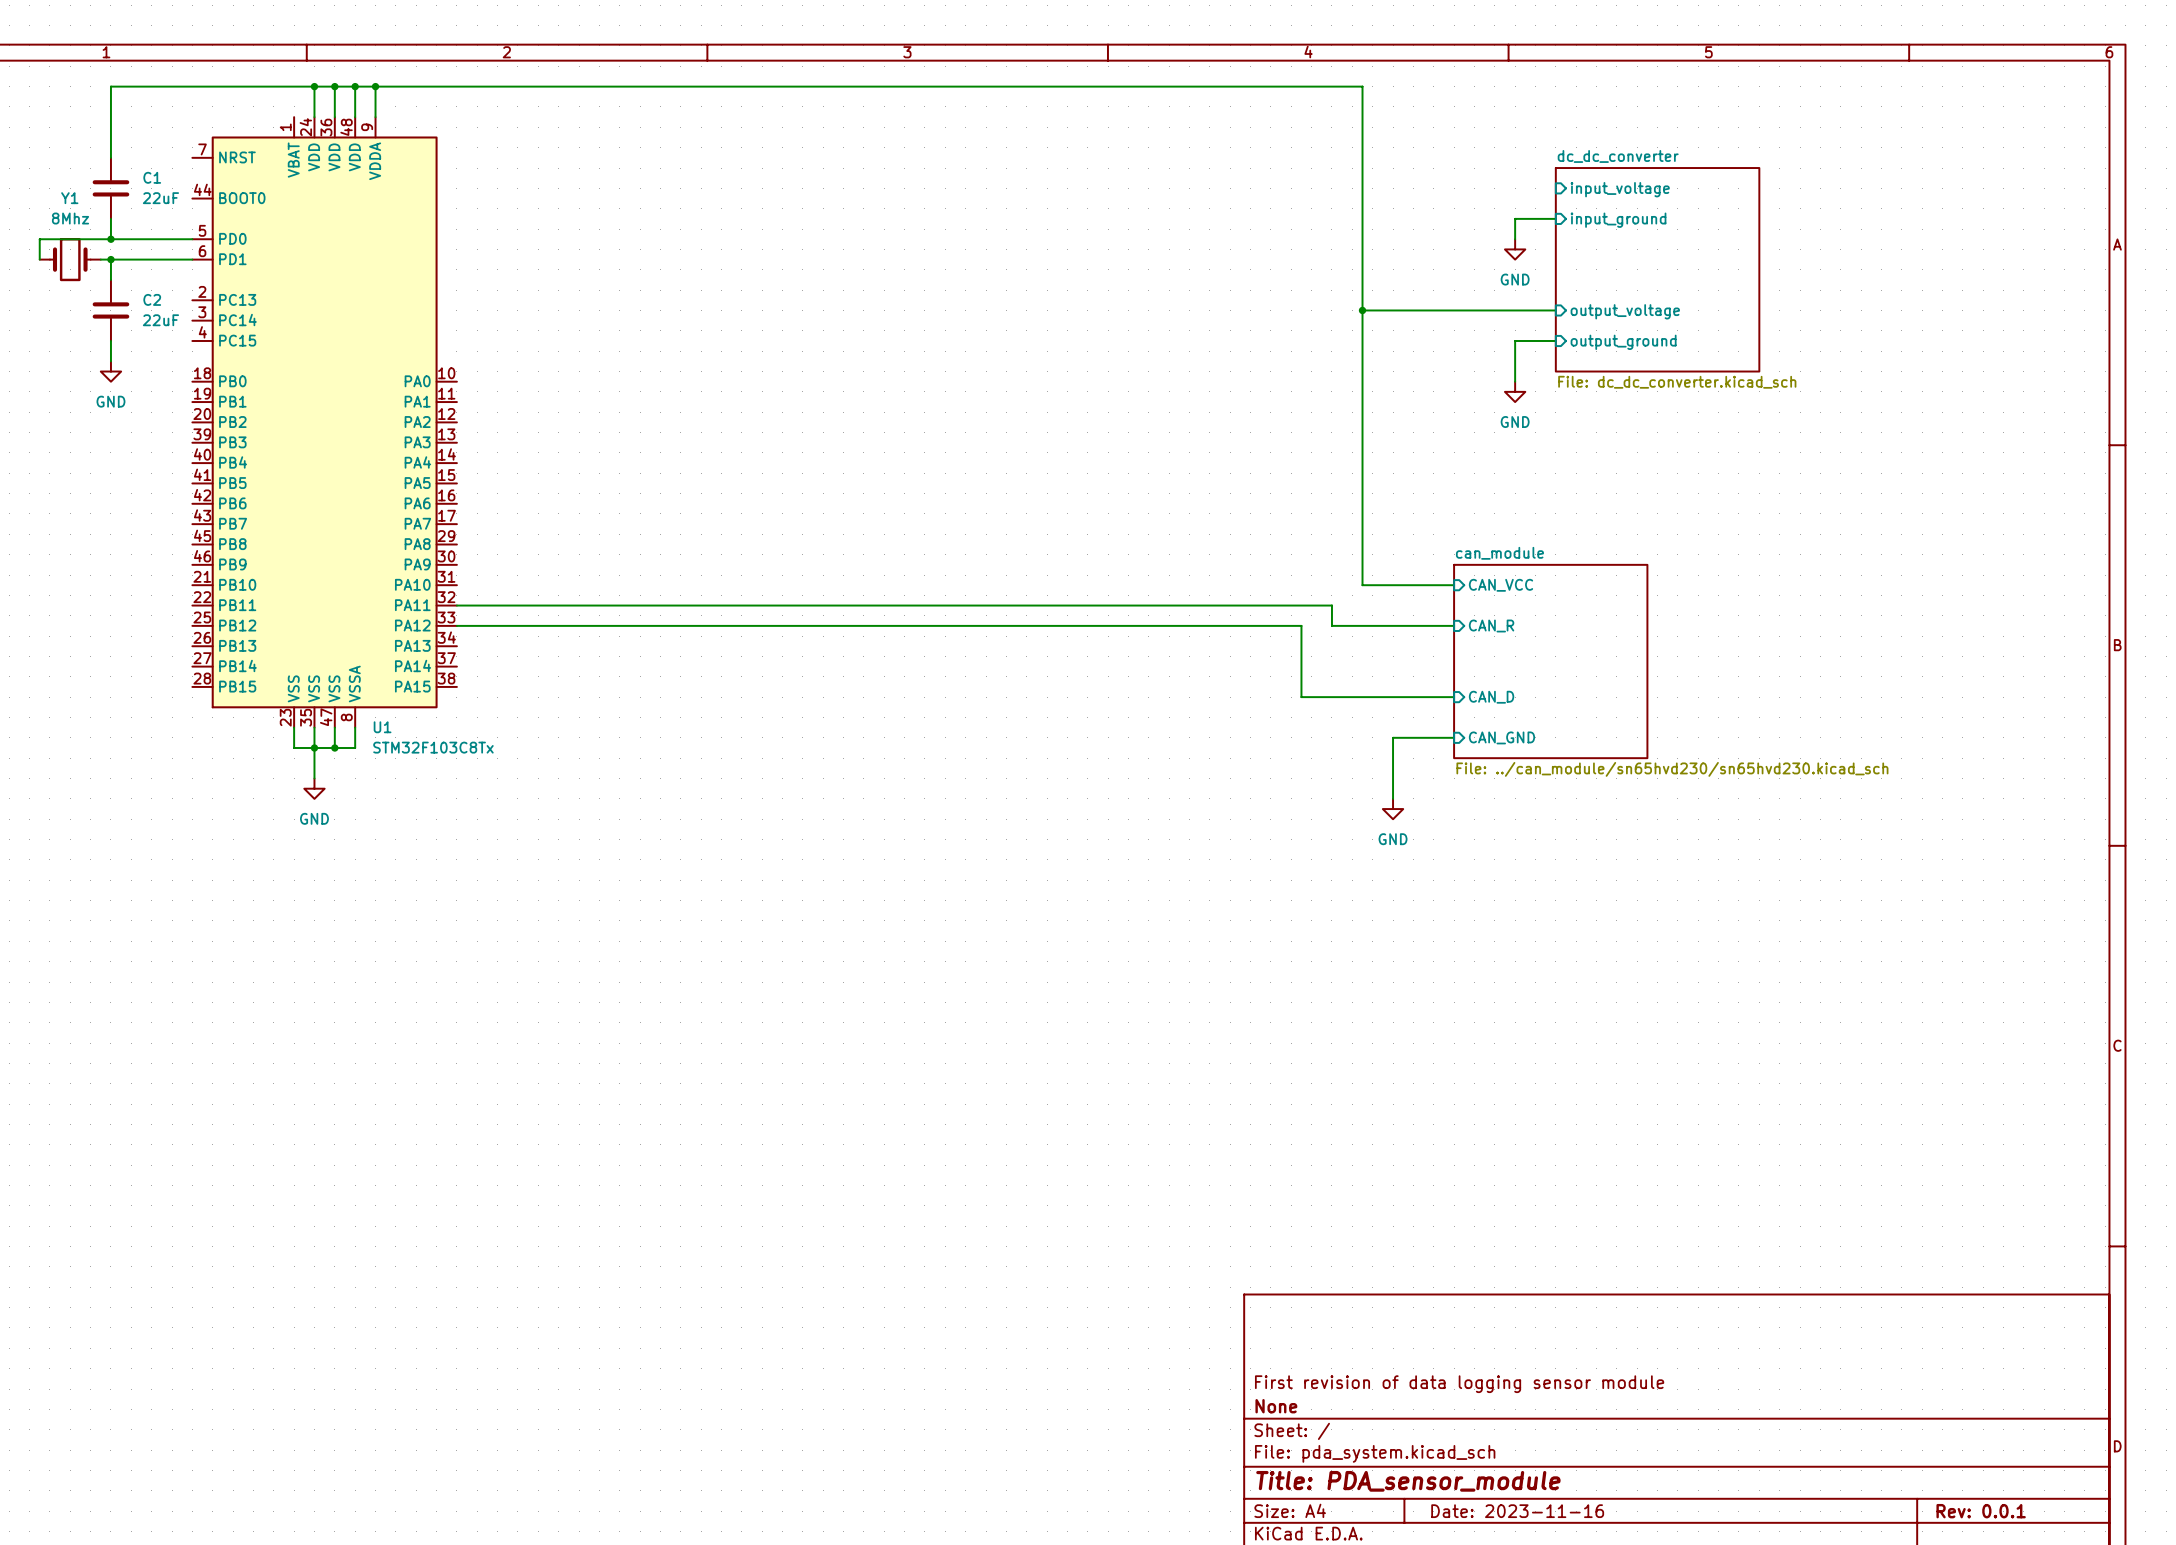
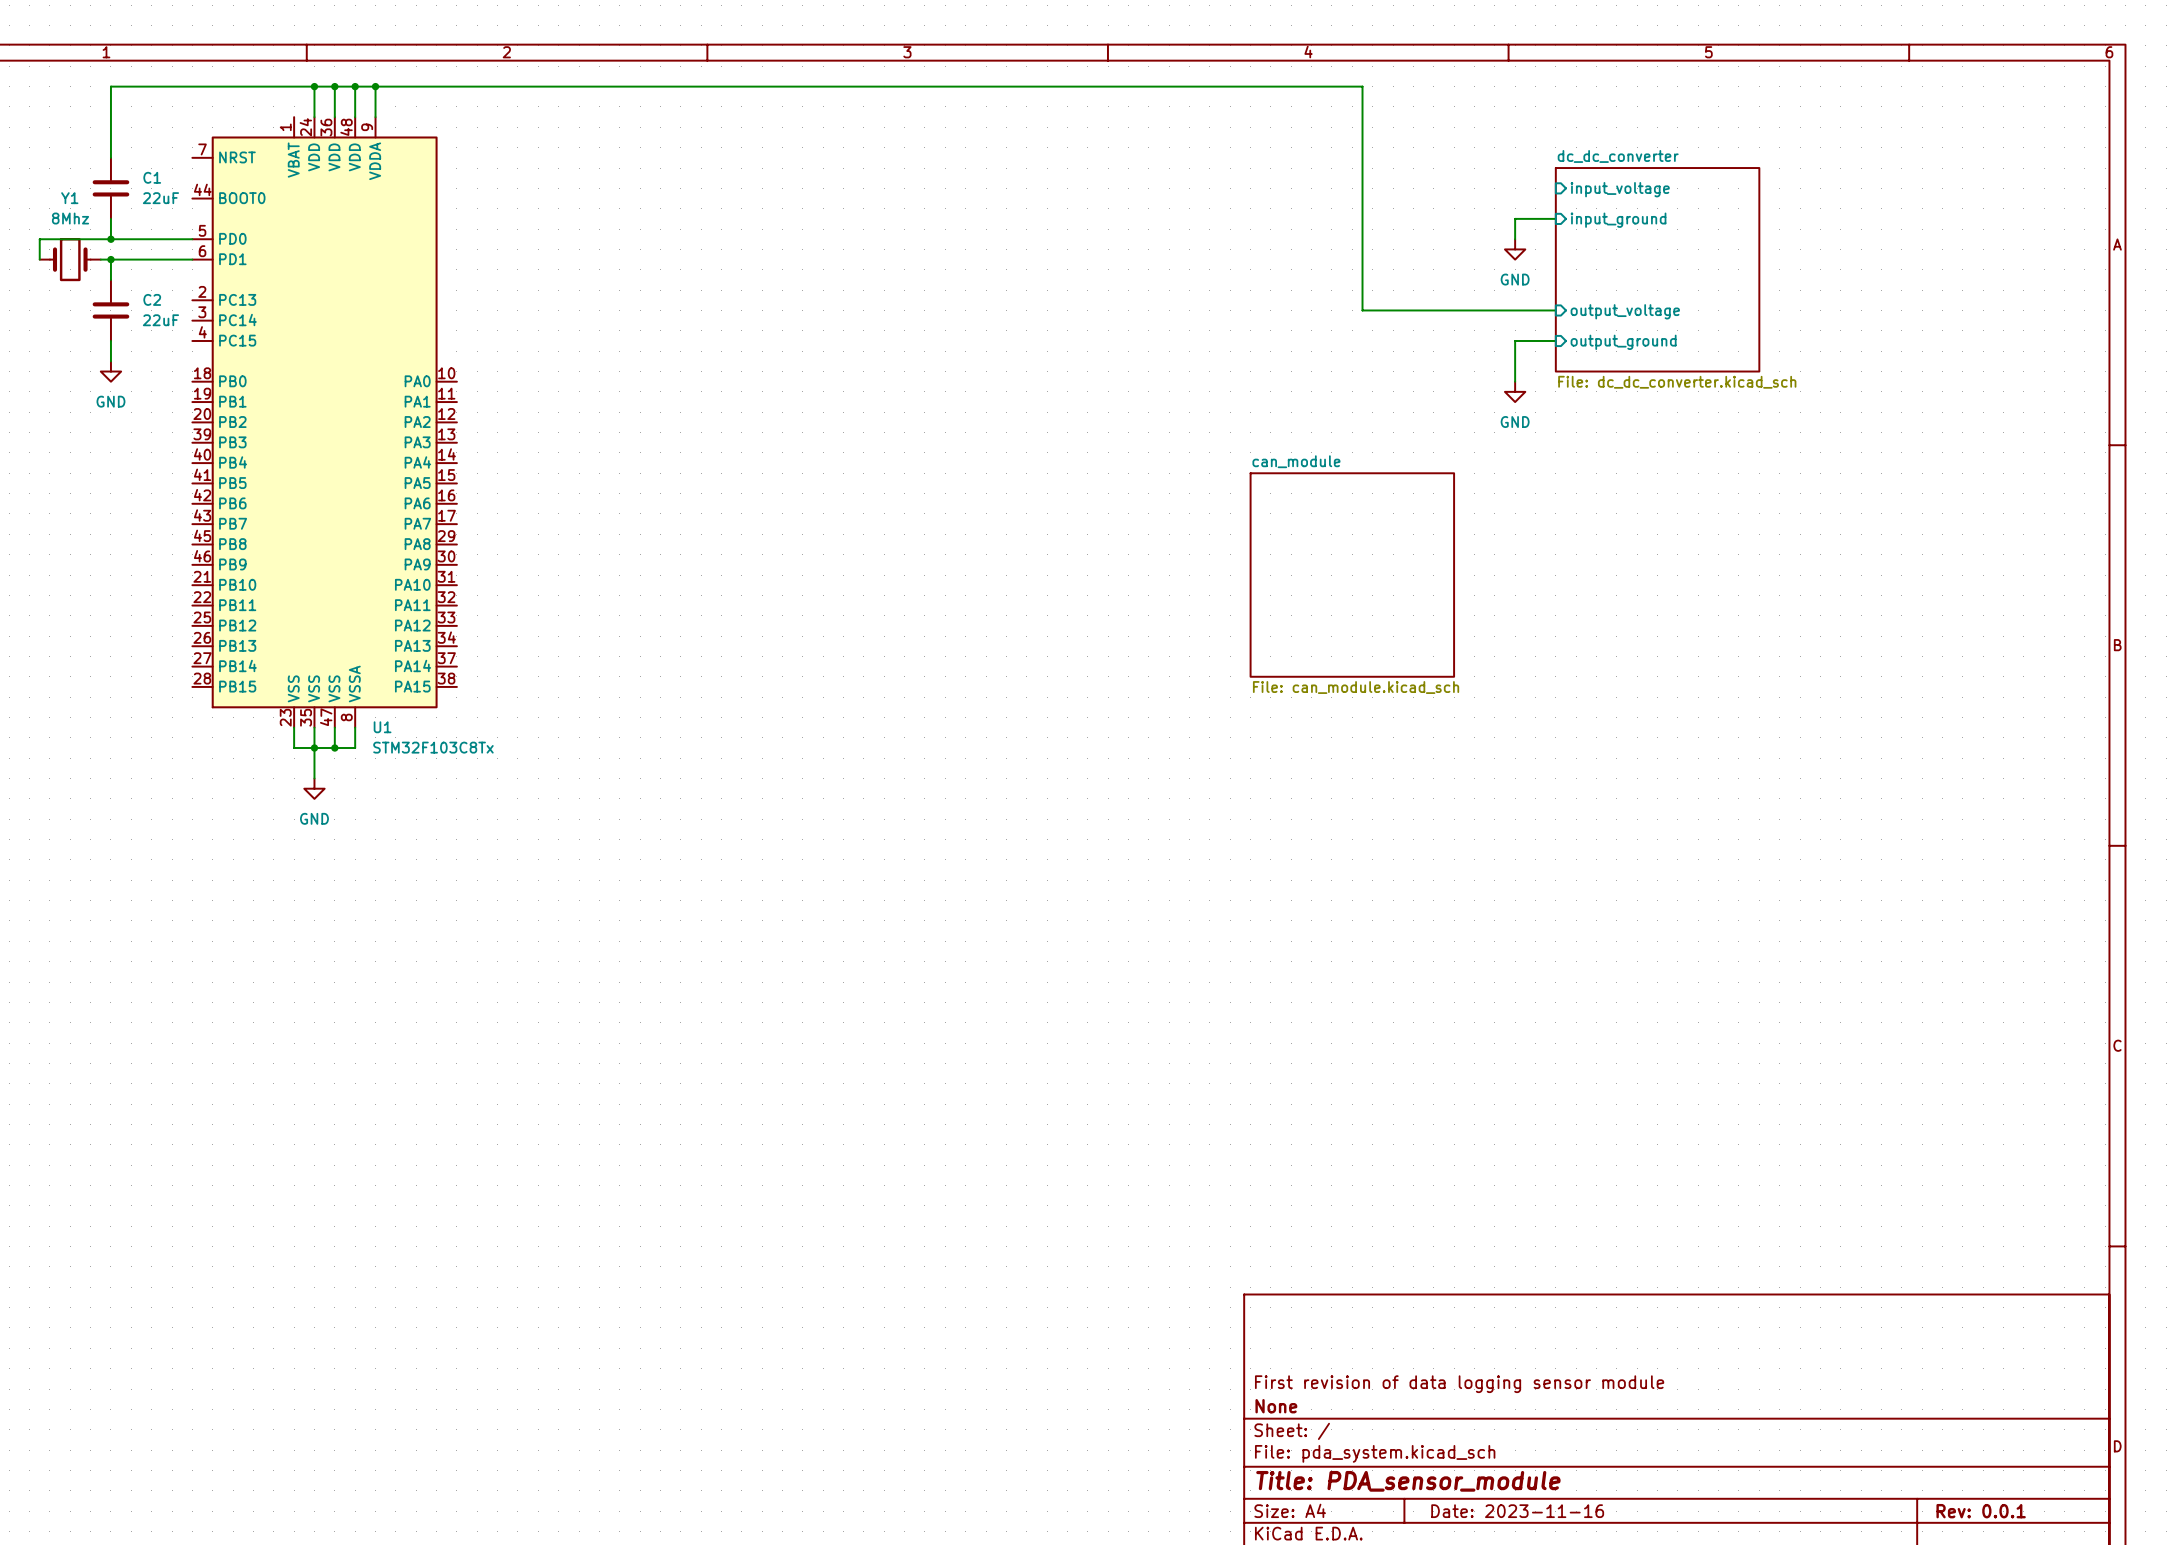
wire: (1362, 310) (1362, 585) (1454, 585) -> none
junction: (1362, 310) -> none
sheet can_module: none -> File: can_module.kicad_sch (1352, 575)
sheet pin: CAN_VCC (1501, 585) -> none
wire: (456, 605) (1331, 605) (1331, 625) (1454, 625) -> none
wire: (456, 625) (1301, 625) (1301, 697) (1454, 697) -> none
sheet pin: CAN_R (1491, 626) -> none
sheet can_module: File: ../can_module/sn65hvd230/sn65hvd230.kicad_sch (1550, 661) -> none
sheet pin: CAN_D (1491, 697) -> none
wire: (1454, 737) (1393, 737) (1393, 798) -> none
sheet pin: CAN_GND (1501, 737) -> none
power symbol: GND (1393, 809) -> none

